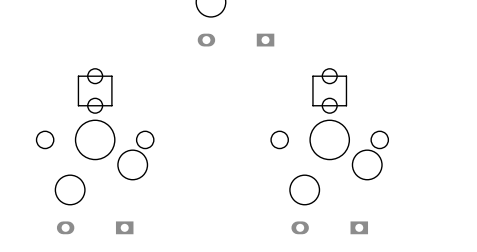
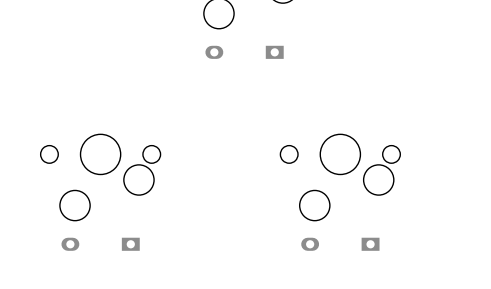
part: (95, 90) -> none
part: (329, 90) -> none

